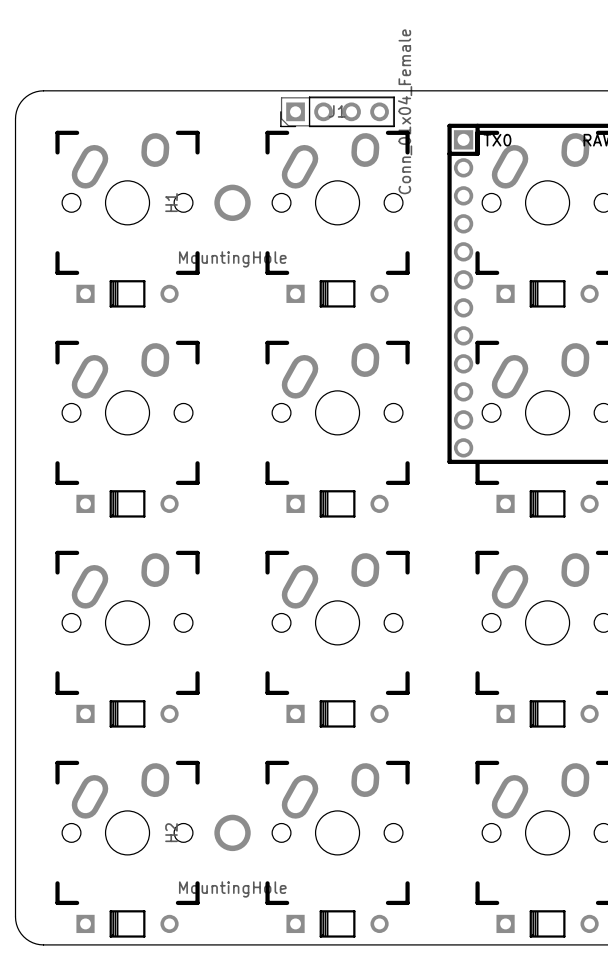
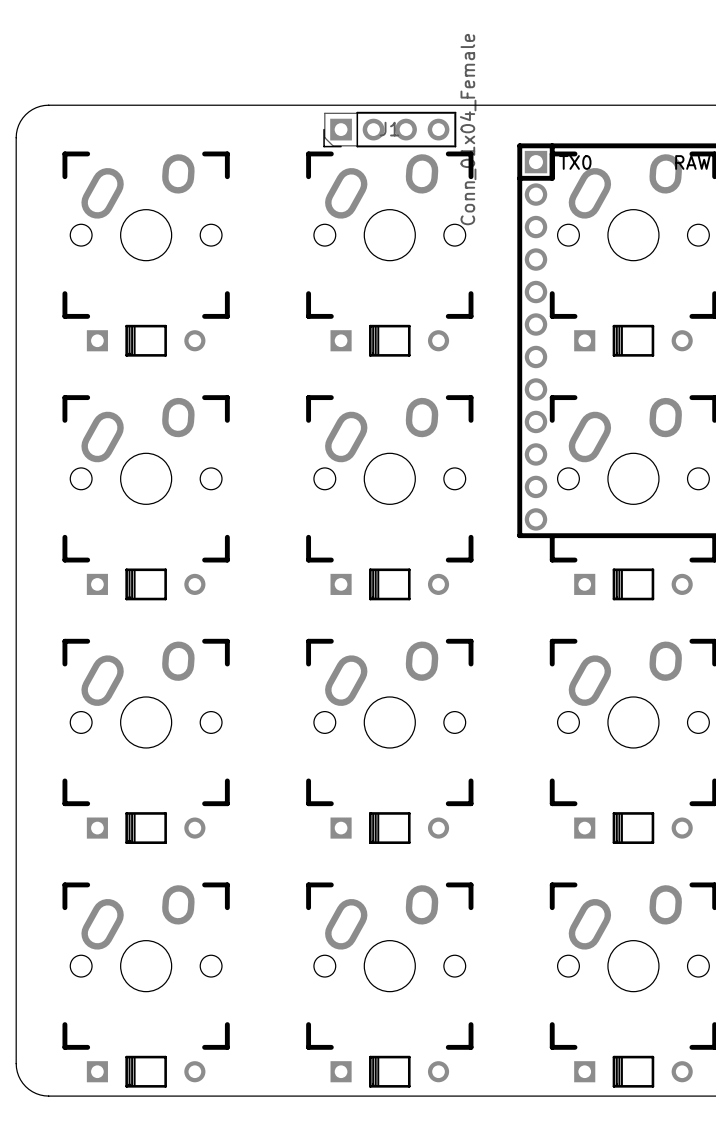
H1: MountingHole (232, 202) -> none
H2: MountingHole (232, 832) -> none

